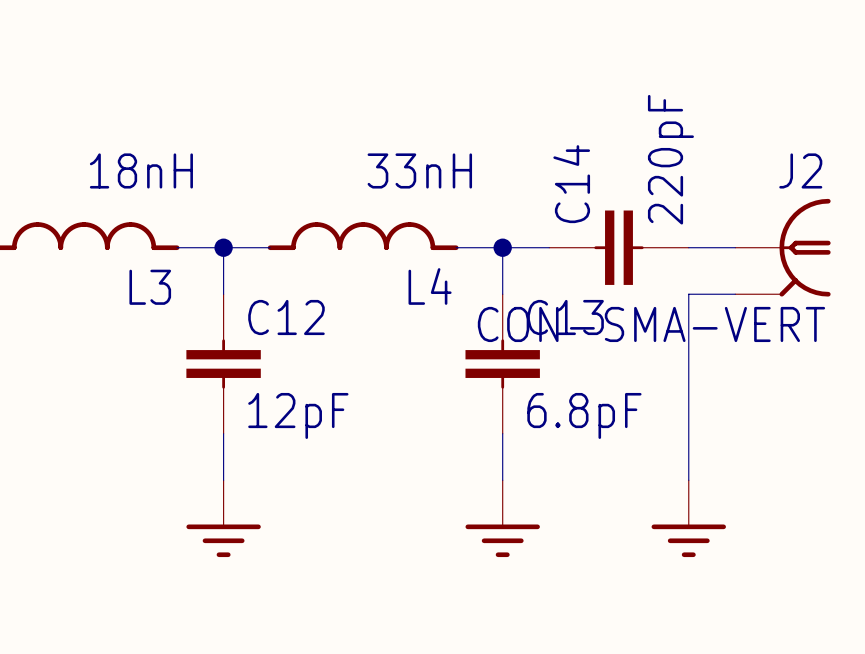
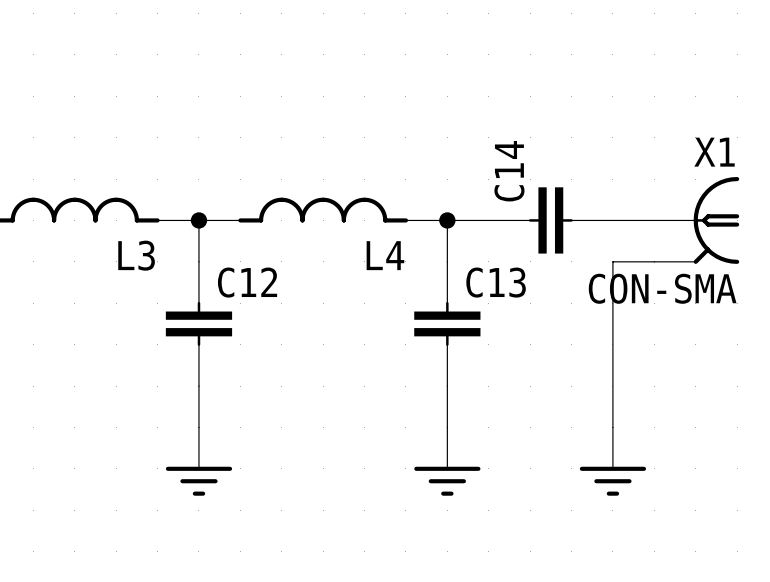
C14 value: 220pF (670, 159) -> none
L3 value: 18nH (141, 170) -> none
L4 value: 33nH (419, 170) -> none
J2 name: J2 (800, 170) -> X1 (714, 152)
J2 value: CON-SMA-VERT (651, 324) -> CON-SMA (662, 288)
C12 value: 12pF (298, 415) -> none
C13 value: 6.8pF (584, 415) -> none

